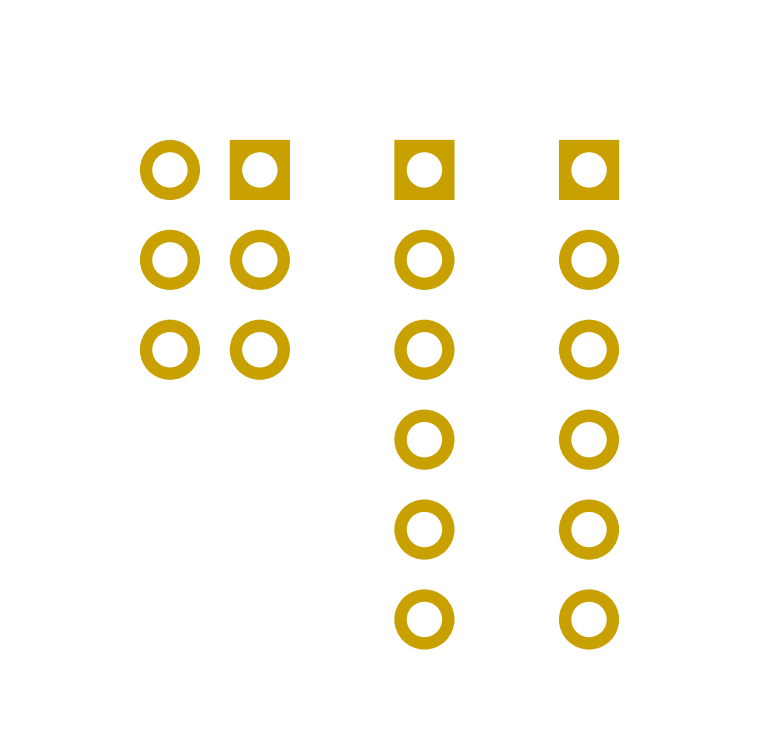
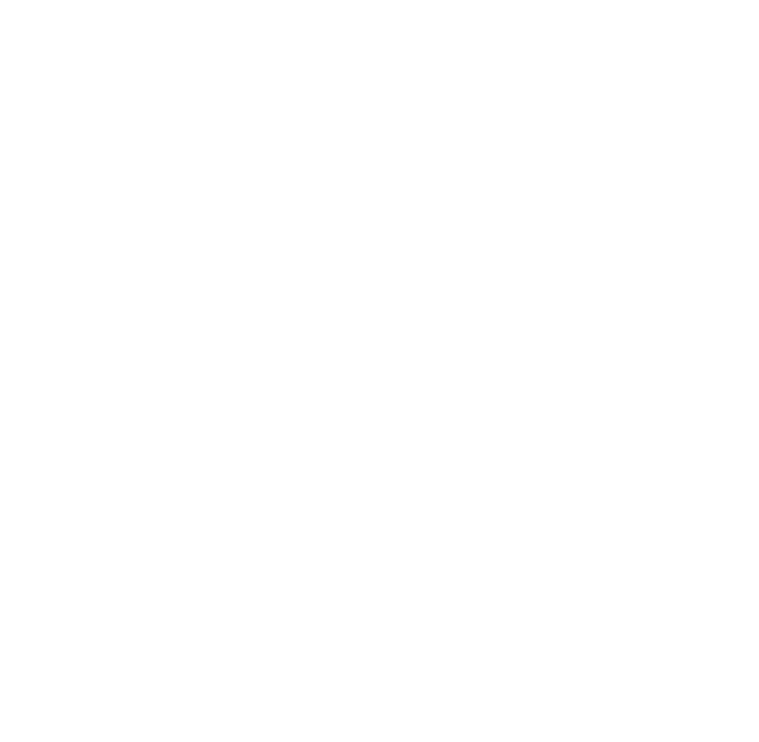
part: (214, 259) -> none
part: (424, 394) -> none
part: (589, 394) -> none

